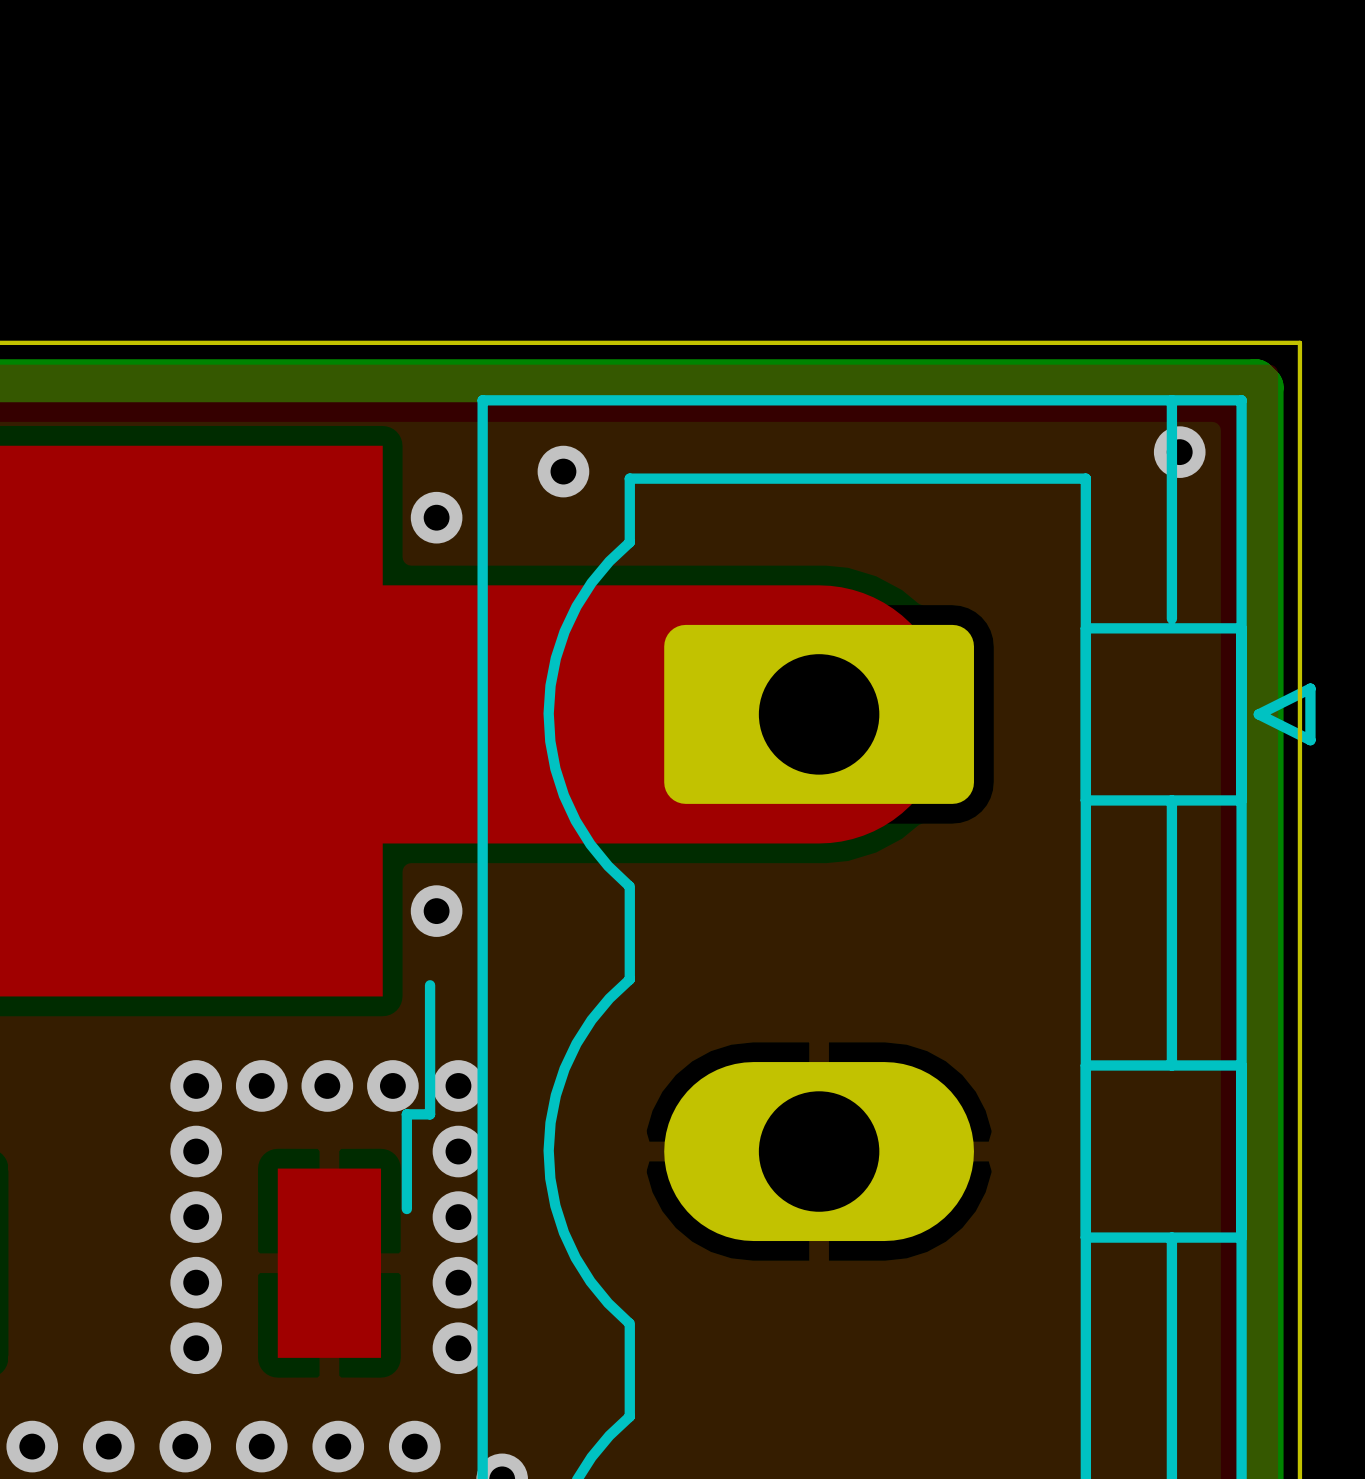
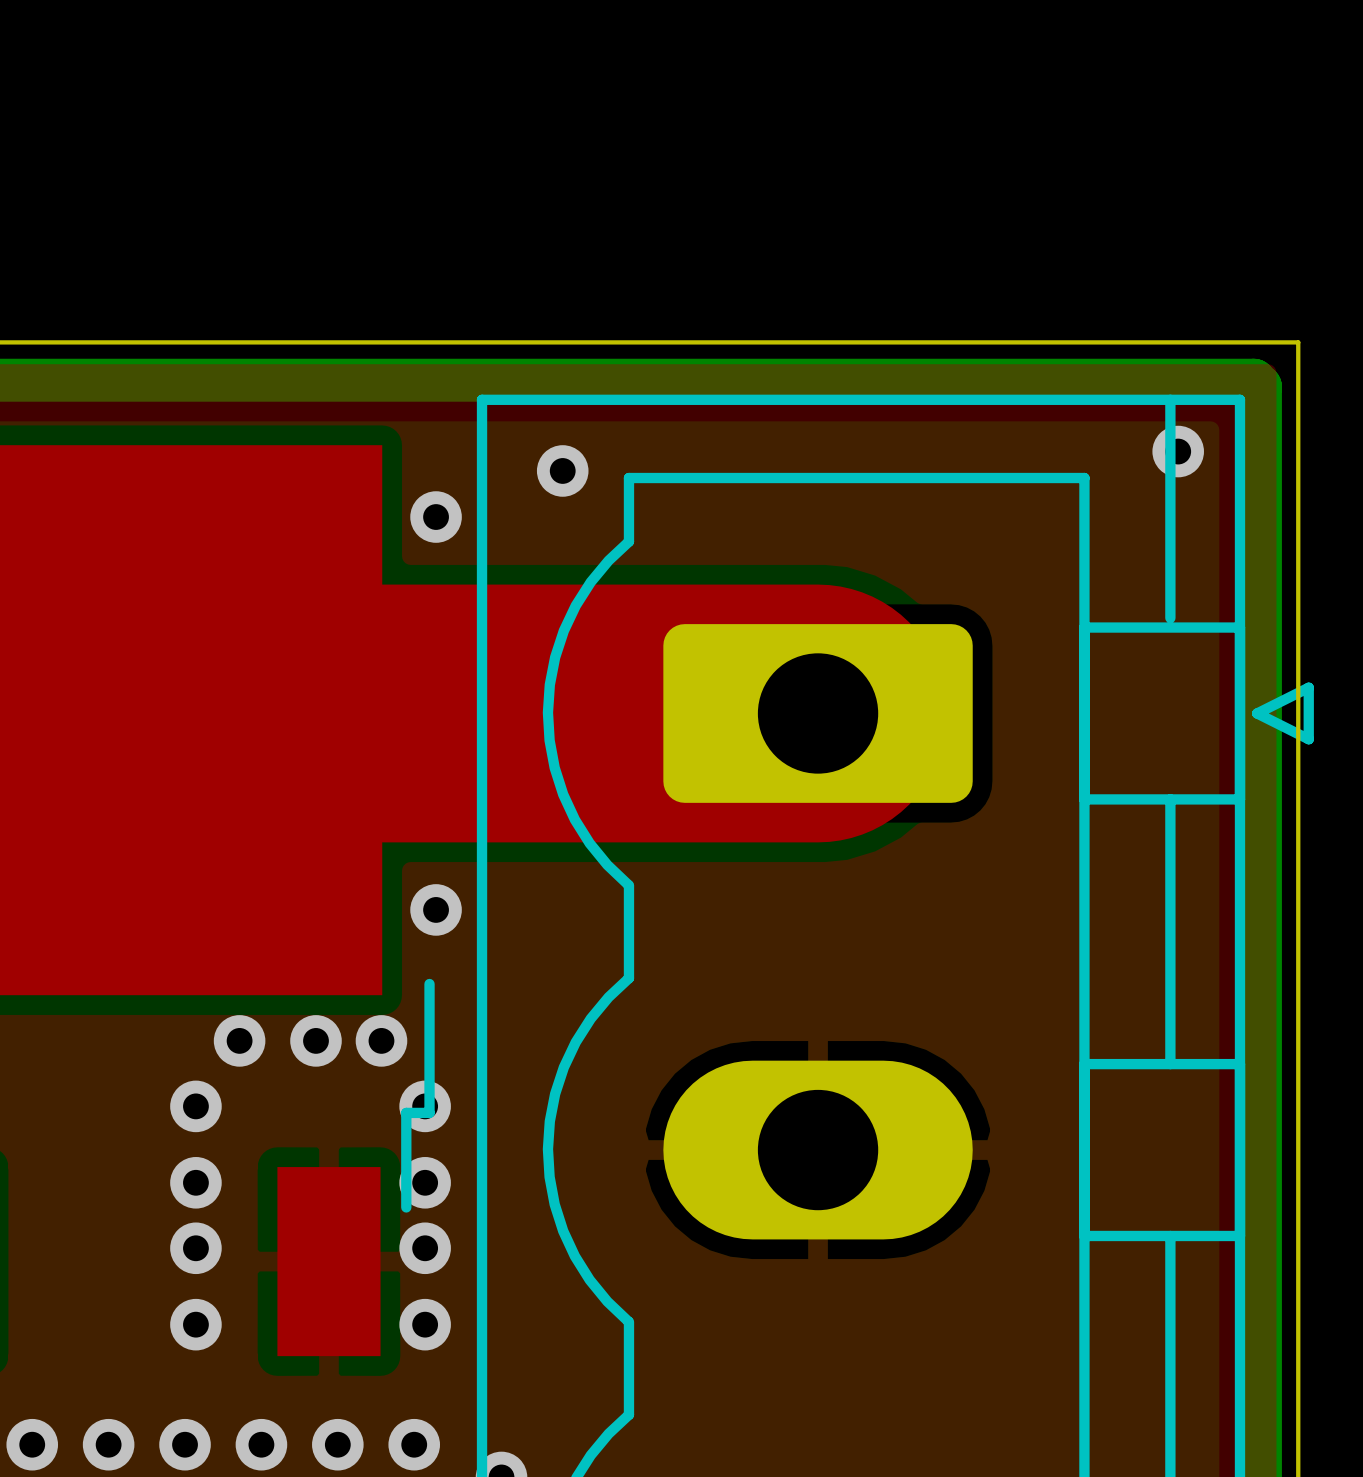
via: none -> (239, 1040)
via: none -> (381, 1040)
via: (196, 1085) -> none
via: (261, 1085) -> none
via position: (327, 1085) -> (315, 1040)
via: (392, 1085) -> none
via: (458, 1085) -> none
via: none -> (195, 1106)
via: none -> (425, 1106)
via: (196, 1151) -> none
via: (458, 1151) -> none
via: none -> (195, 1182)
via: none -> (425, 1182)
via: (196, 1217) -> none
via: (458, 1217) -> none
via: none -> (195, 1248)
via: none -> (425, 1248)
via: (196, 1282) -> none
via: (458, 1282) -> none
via: none -> (195, 1324)
via: none -> (425, 1324)
via: (196, 1348) -> none
via: (458, 1348) -> none

